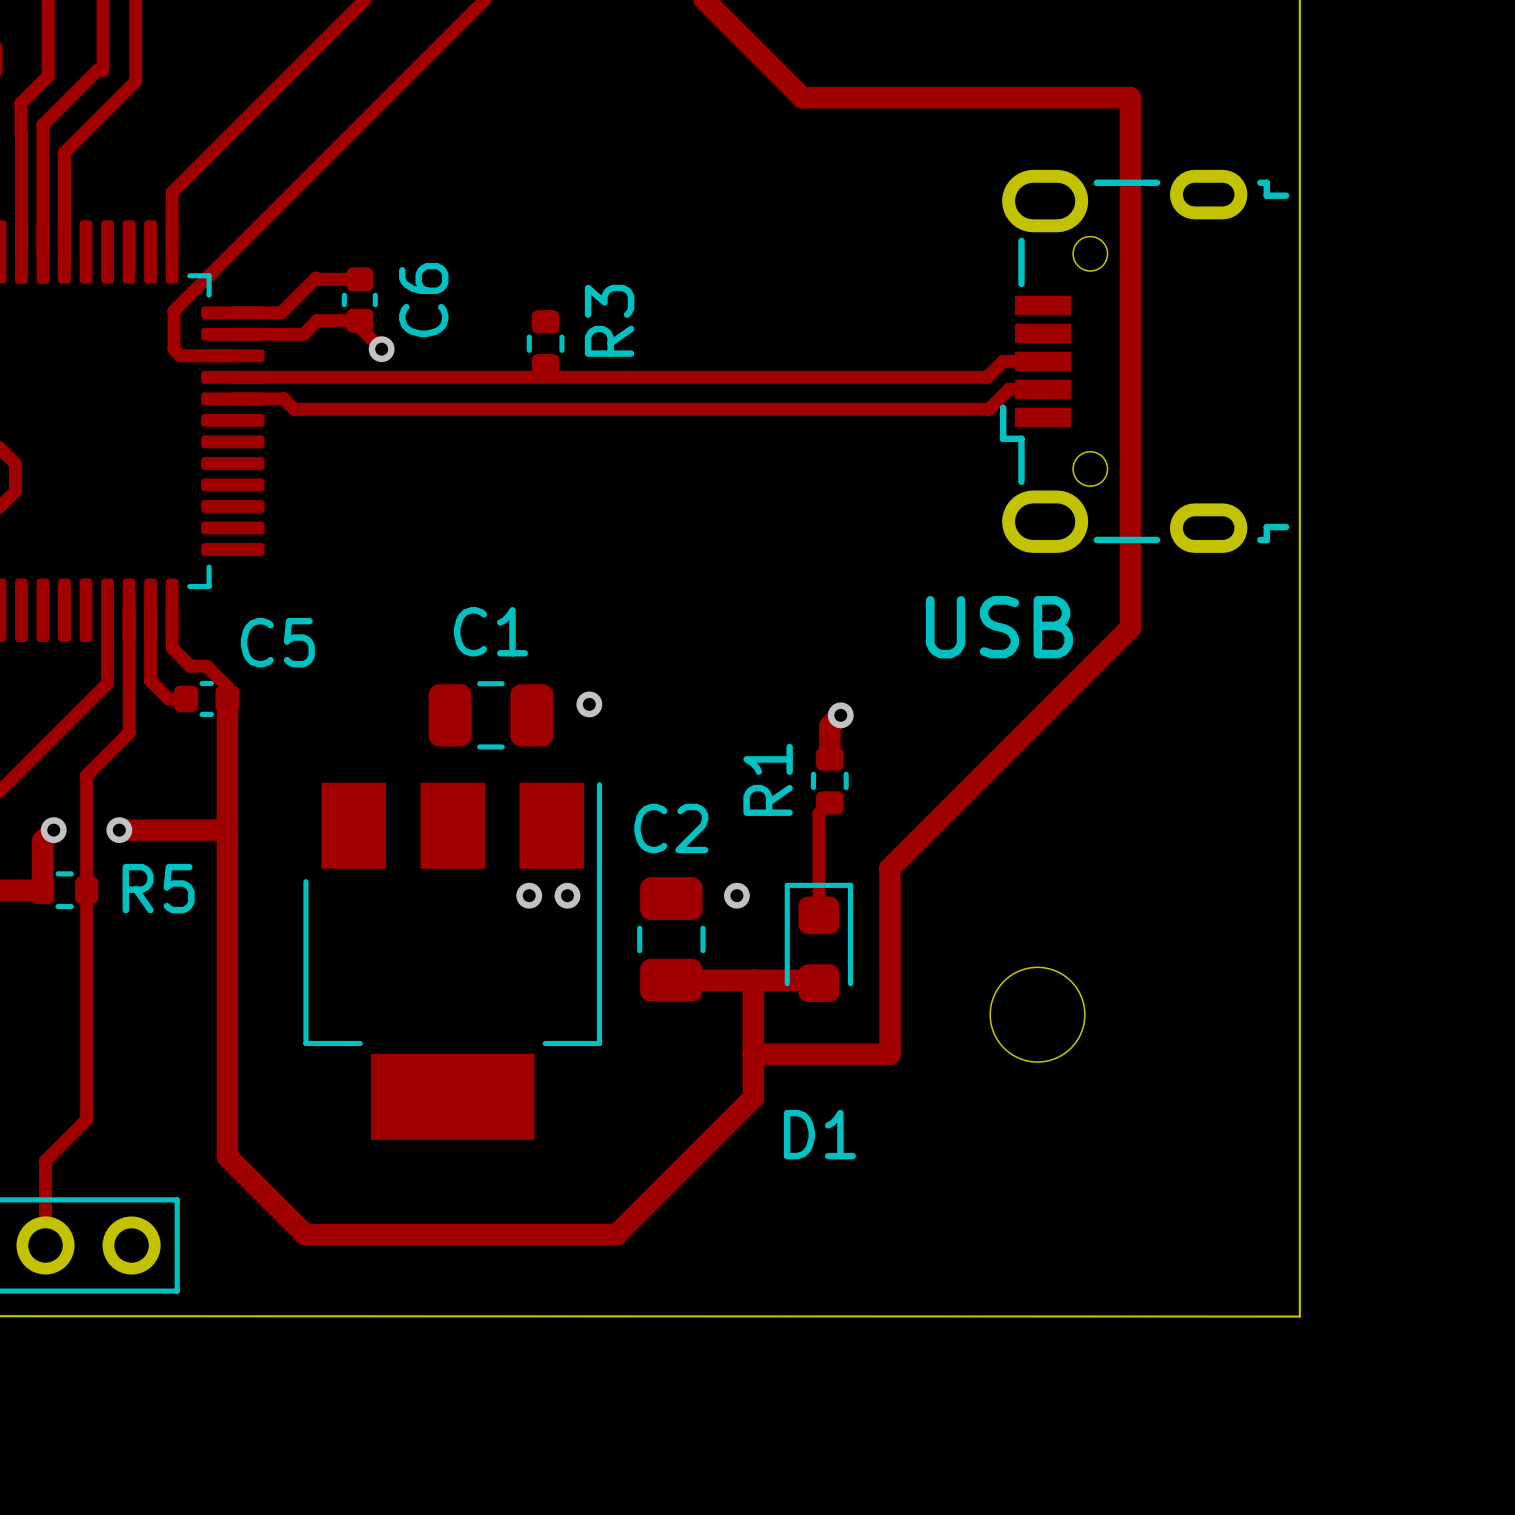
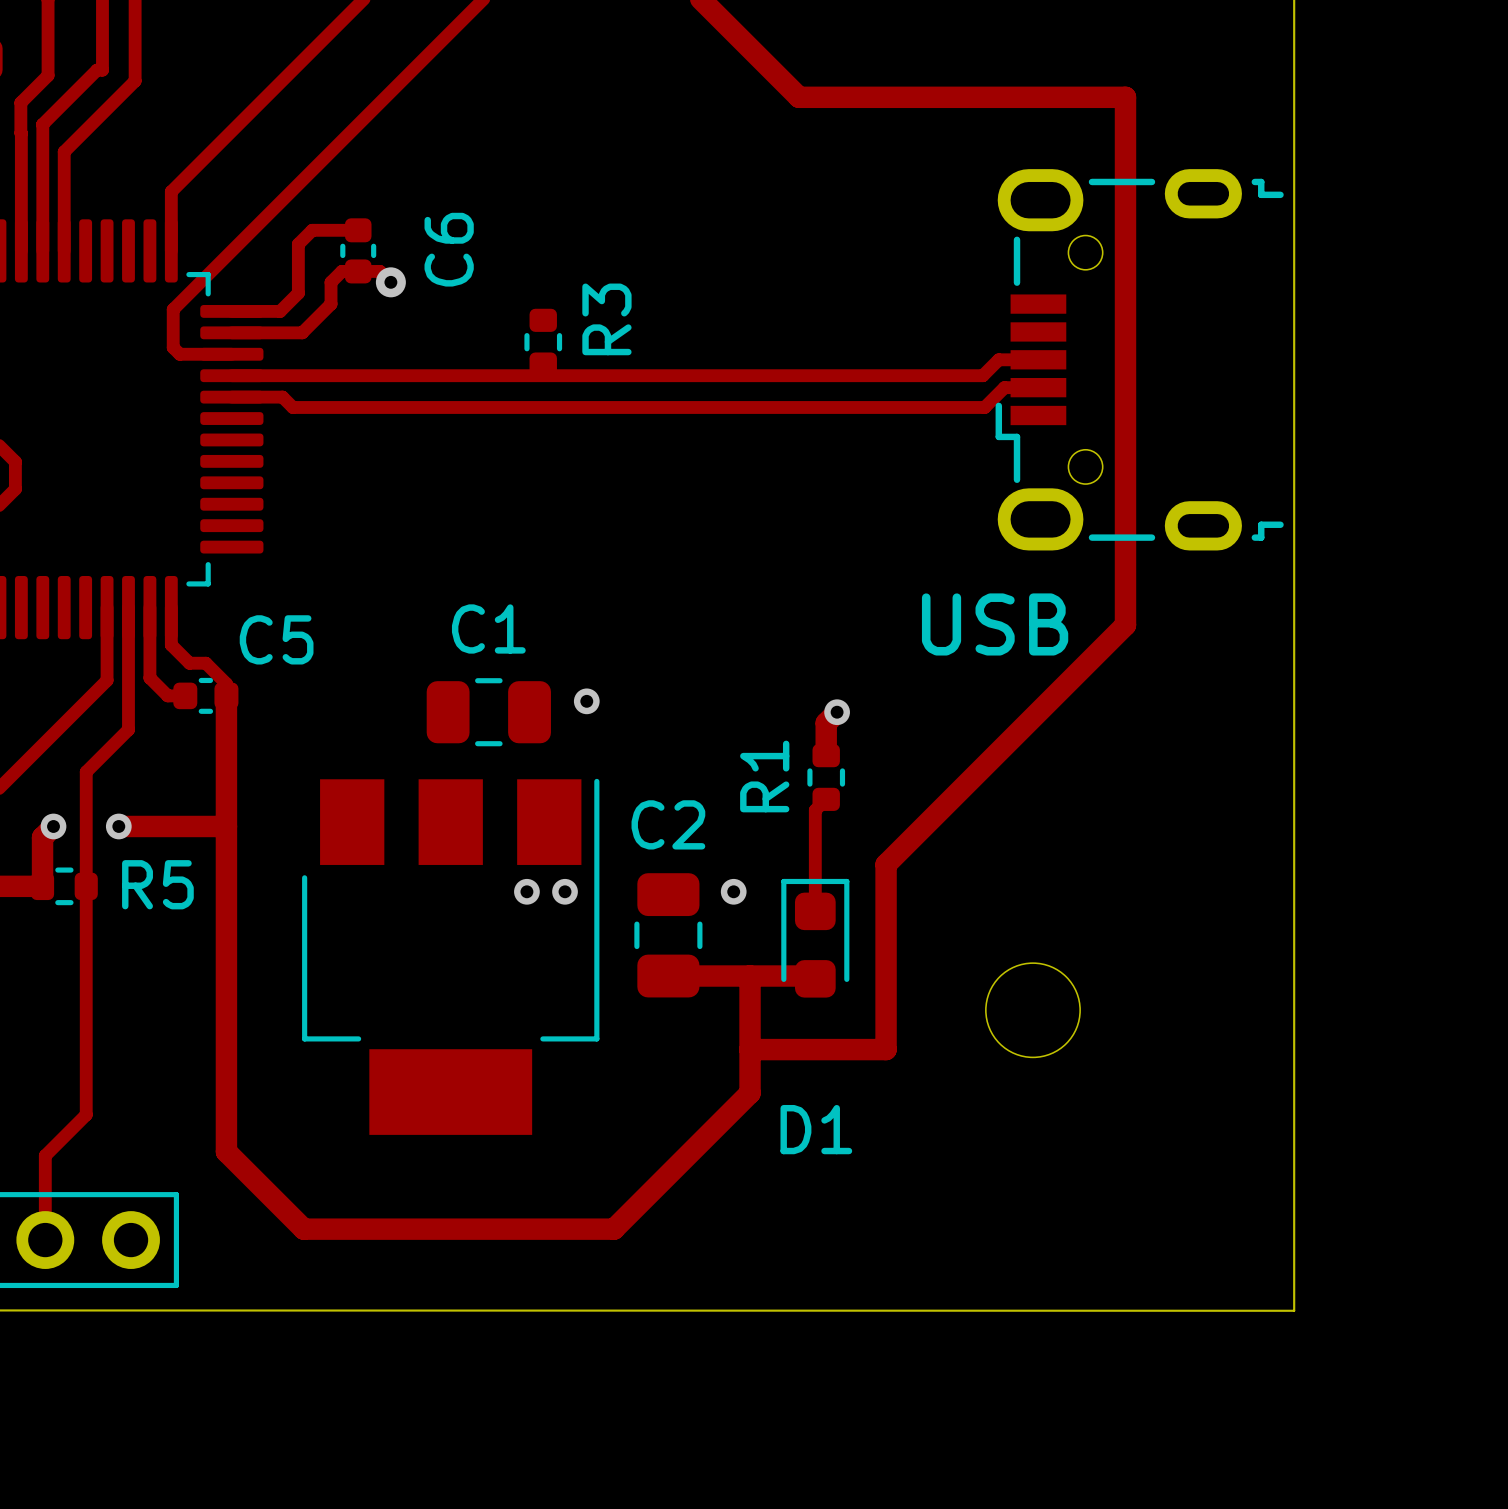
track: (359, 279) (316, 278) (299, 294) -> (358, 230) (312, 230) (298, 244) (298, 293)
via: none -> (390, 282)
C6 position: (359, 299) -> (358, 250)
C6 name position: C6 (423, 299) -> C6 (449, 249)
track: (317, 320) (359, 320) (359, 327) (381, 349) -> (315, 319) (331, 304) (331, 282) (341, 271) (380, 271) (390, 282)
via: (381, 349) -> none

